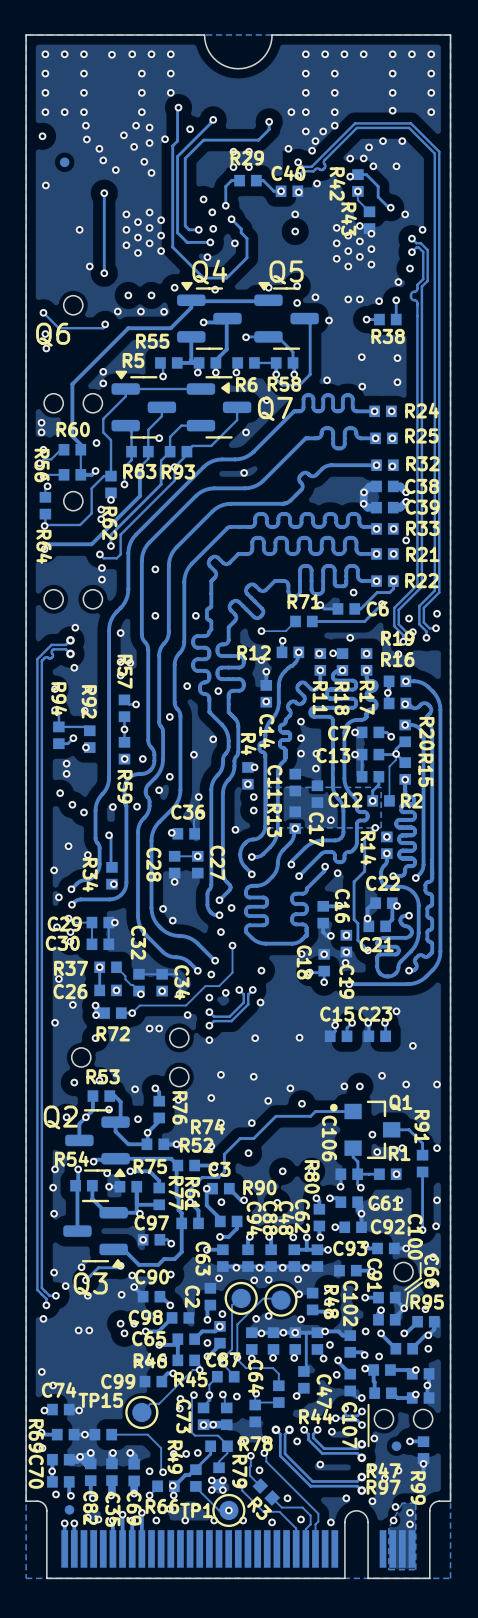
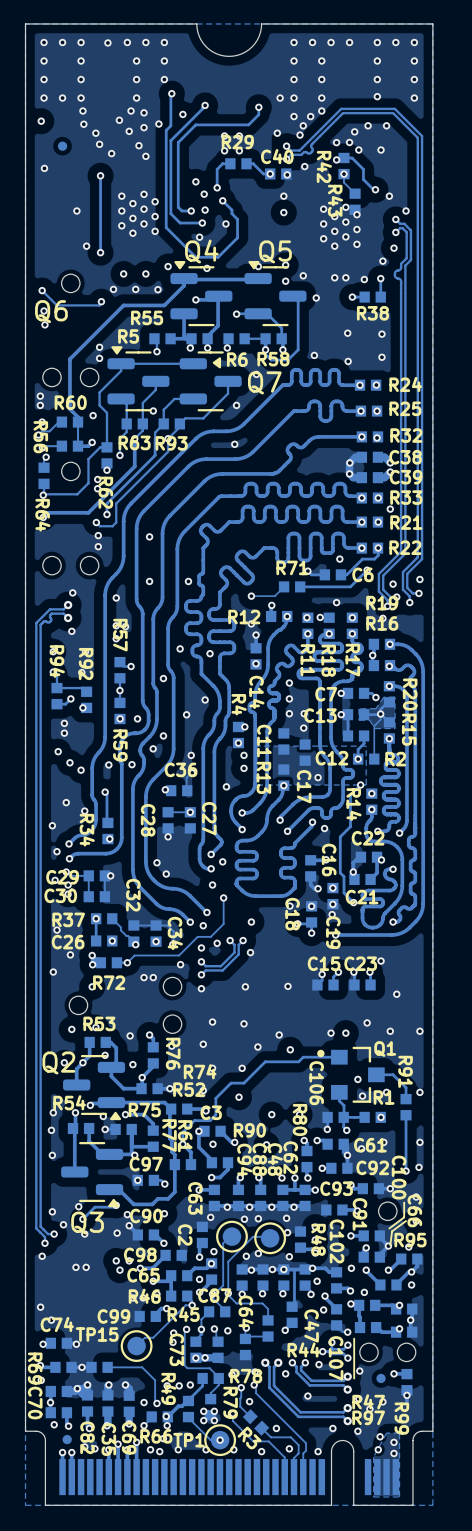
zone outline: none -> (394, 697) (383, 697) (375, 708) (359, 708) (359, 720) (369, 720) (375, 728) (395, 728) (395, 697)
via: none -> (159, 1451)

